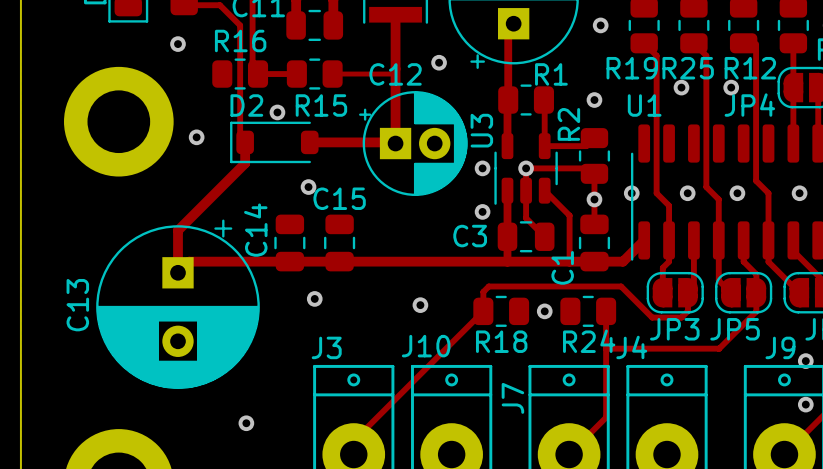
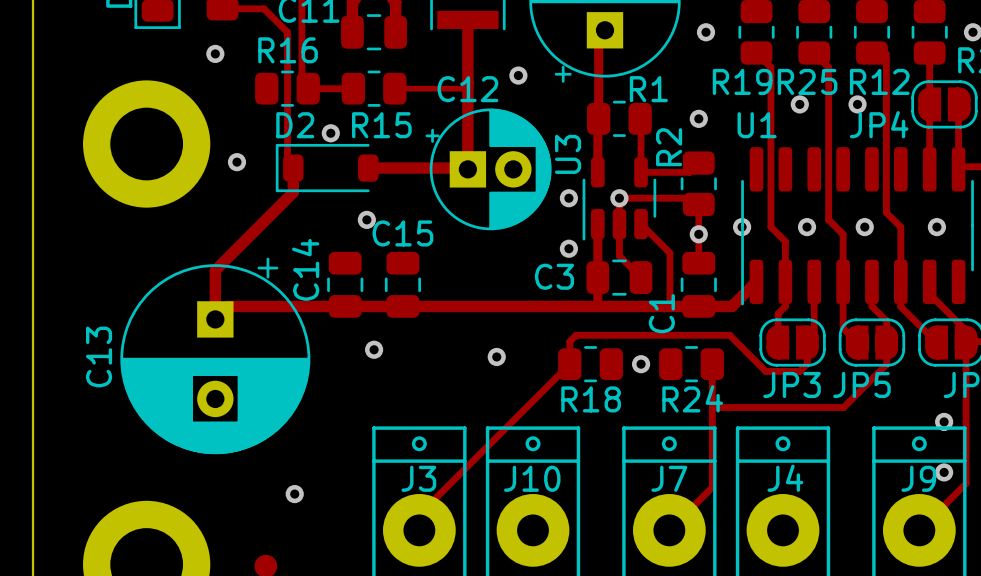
J10 name position: J10 (426, 346) -> J10 (532, 478)
J3 name position: J3 (326, 347) -> J3 (418, 478)
J4 name position: J4 (631, 347) -> J4 (785, 478)
J9 name position: J9 (780, 347) -> J9 (918, 478)
J7 name rotation: 0° (512, 398) -> 90° clockwise (669, 478)
J7 name position: J7 (512, 398) -> J7 (669, 478)

